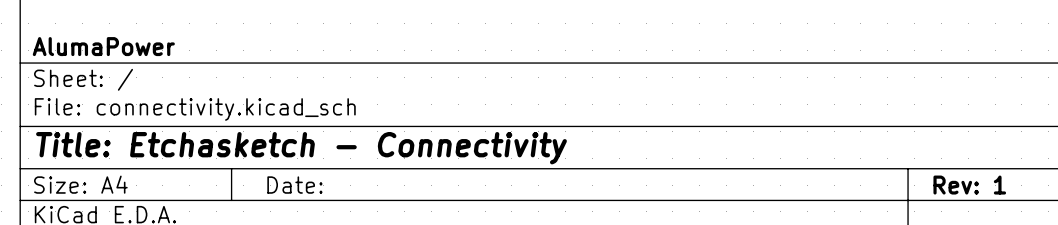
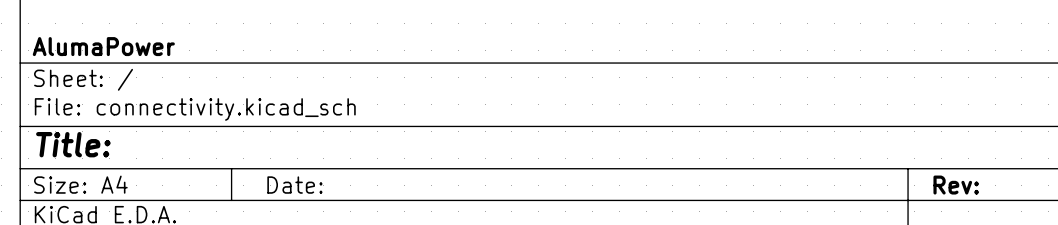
title block: Title: Etchasketch - Connectivity (301, 148) -> Title: (73, 144)
title block: Rev: 1 (969, 185) -> Rev: (956, 185)

